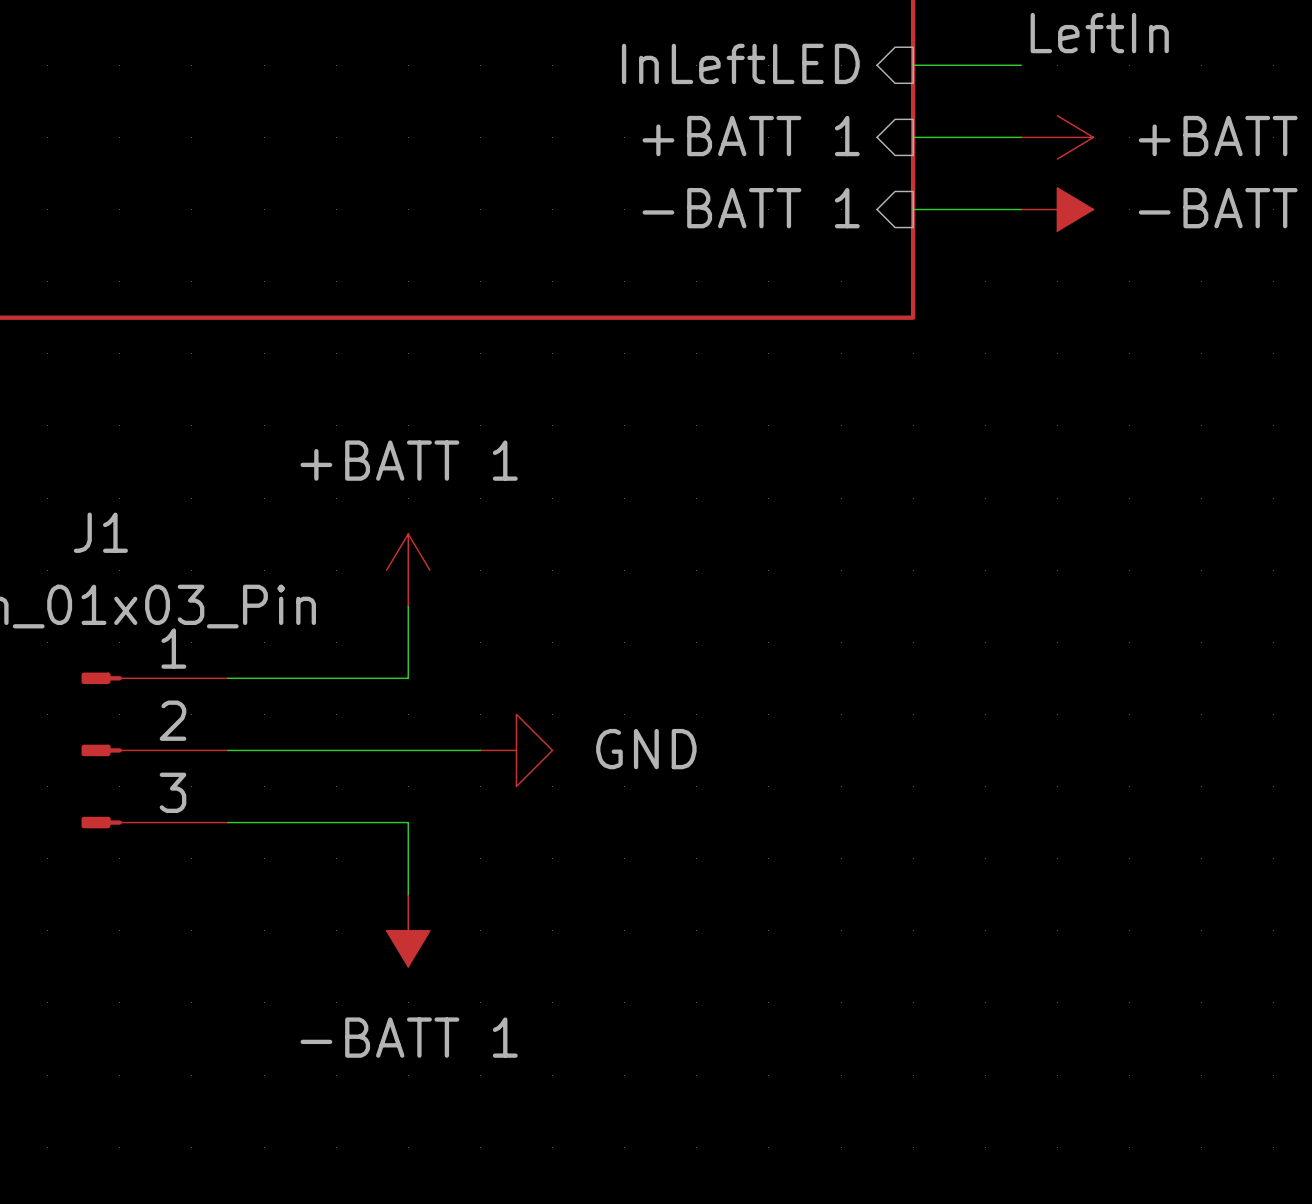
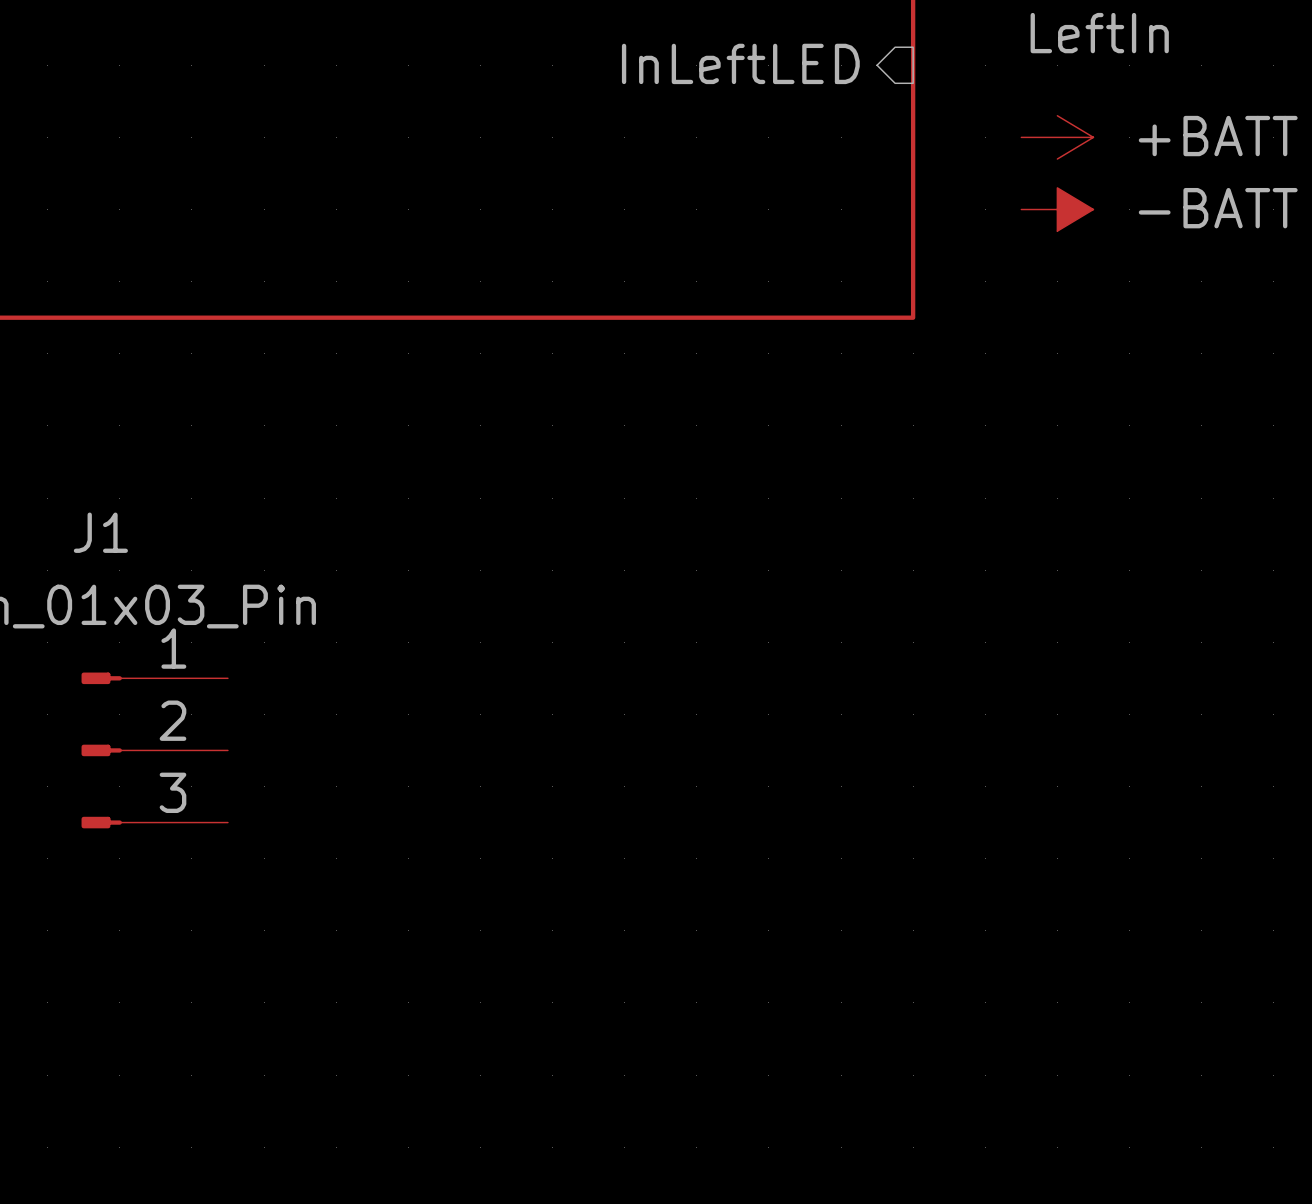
wire: (913, 65) (1021, 65) -> none
sheet pin: +BATT 1 (751, 136) -> none
wire: (913, 137) (1021, 137) -> none
sheet pin: -BATT 1 (751, 208) -> none
wire: (913, 209) (1021, 209) -> none
power symbol: +BATT 1 (408, 570) -> none
wire: (408, 606) (408, 678) (227, 678) -> none
wire: (227, 750) (480, 750) -> none
power symbol: GND (516, 750) -> none
wire: (227, 822) (408, 822) (408, 894) -> none
power symbol: -BATT 1 (408, 930) -> none

